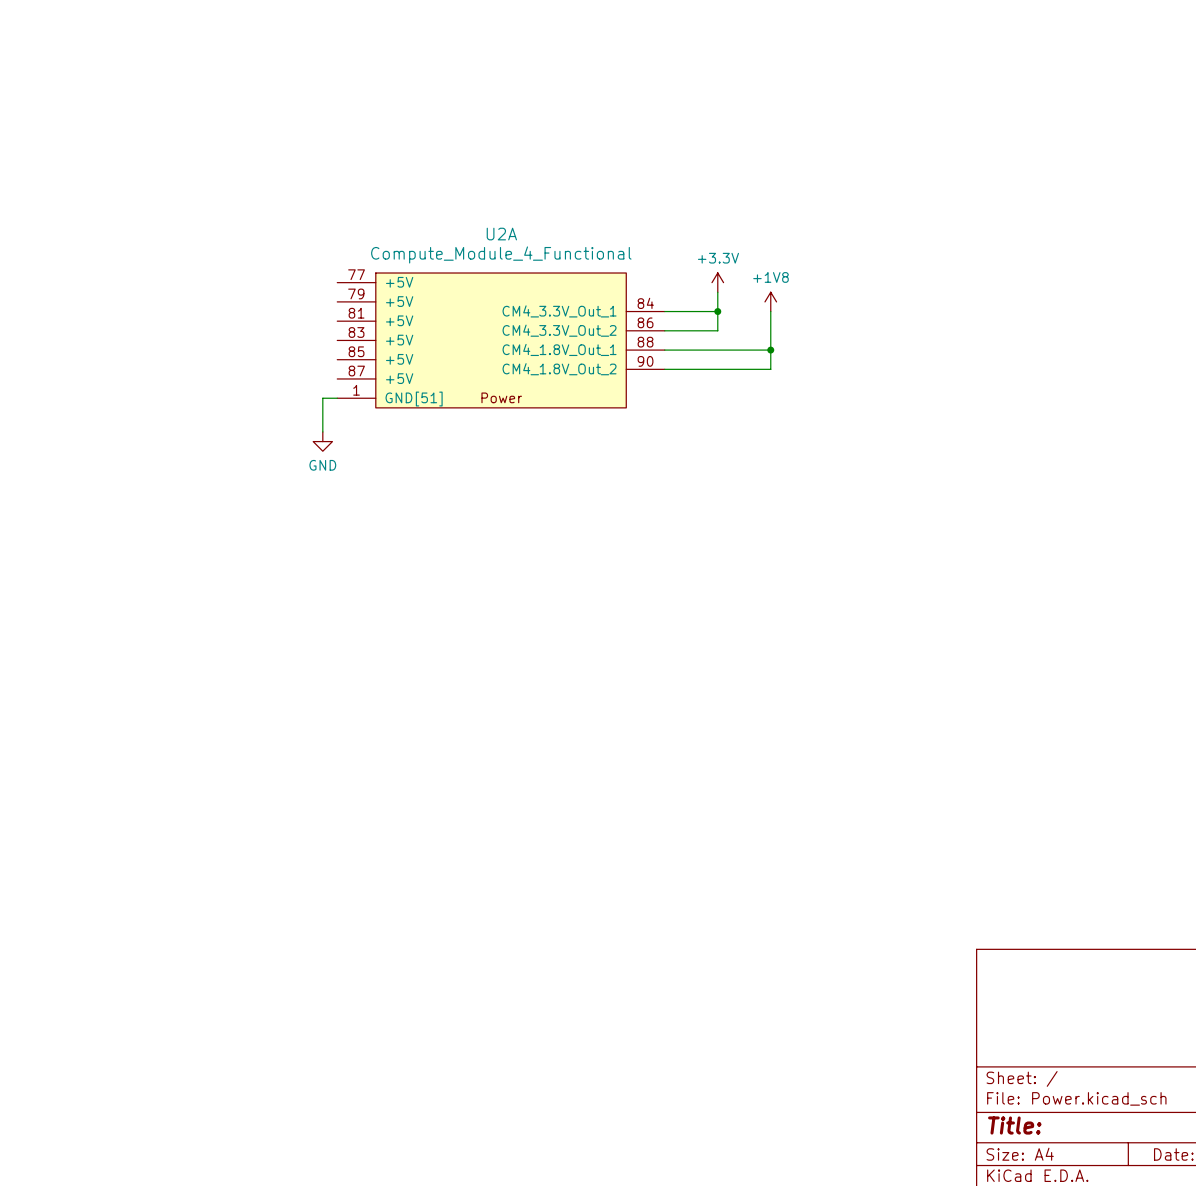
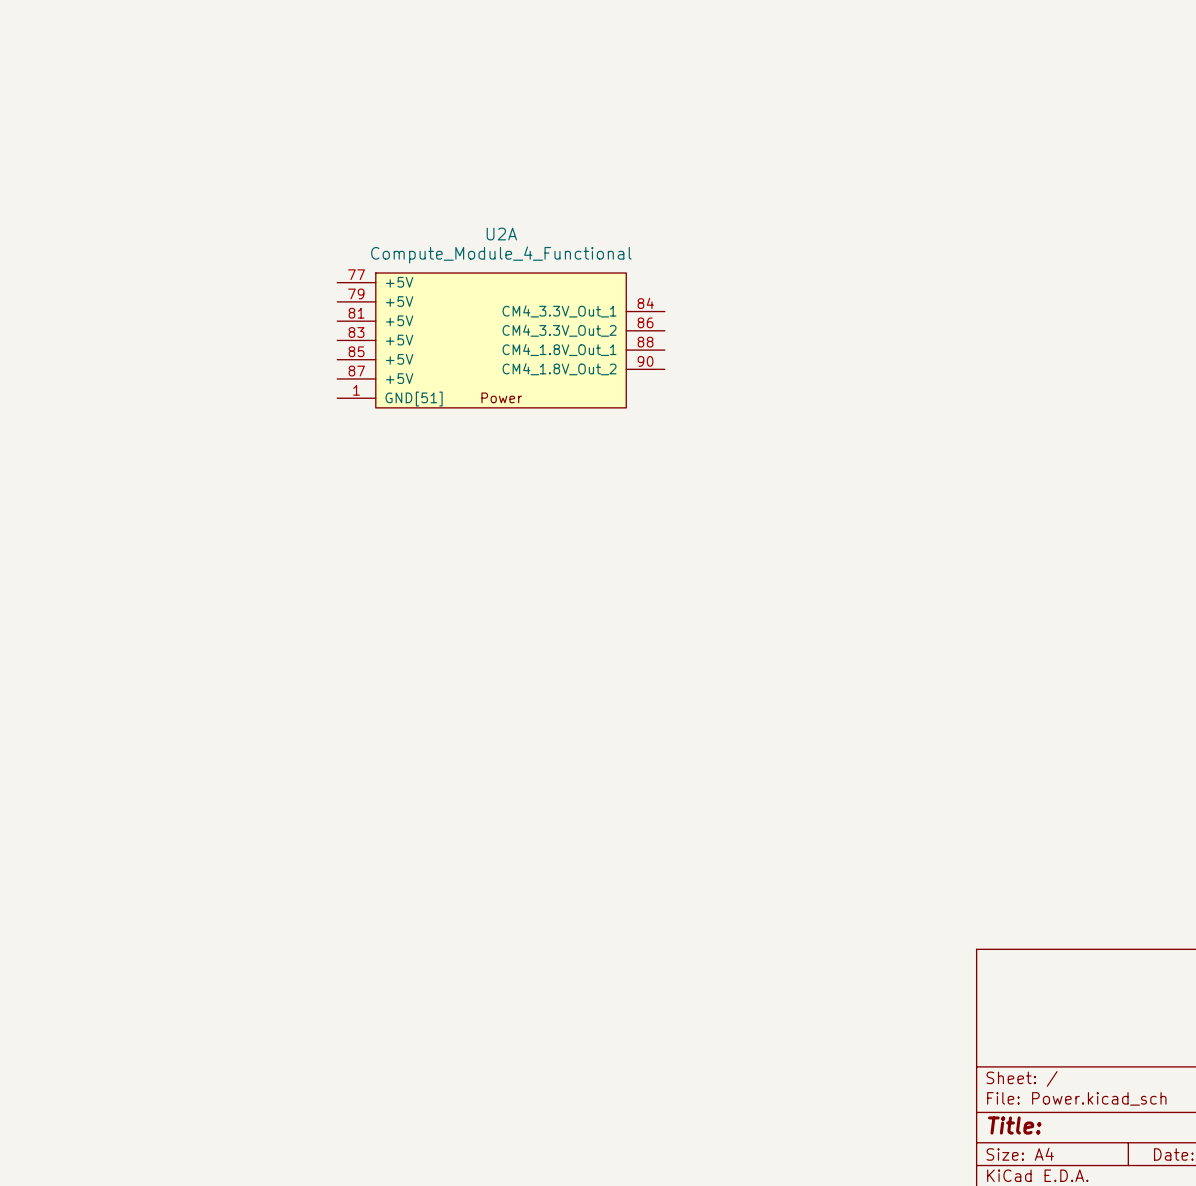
power symbol: +3.3V (717, 282) -> none
wire: (717, 292) (717, 330) (664, 330) -> none
power symbol: +1V8 (770, 301) -> none
wire: (664, 311) (717, 311) -> none
junction: (717, 311) -> none
wire: (770, 311) (770, 369) (664, 369) -> none
wire: (664, 350) (770, 350) -> none
junction: (770, 350) -> none
wire: (337, 398) (322, 398) (322, 431) -> none
power symbol: GND (322, 441) -> none

